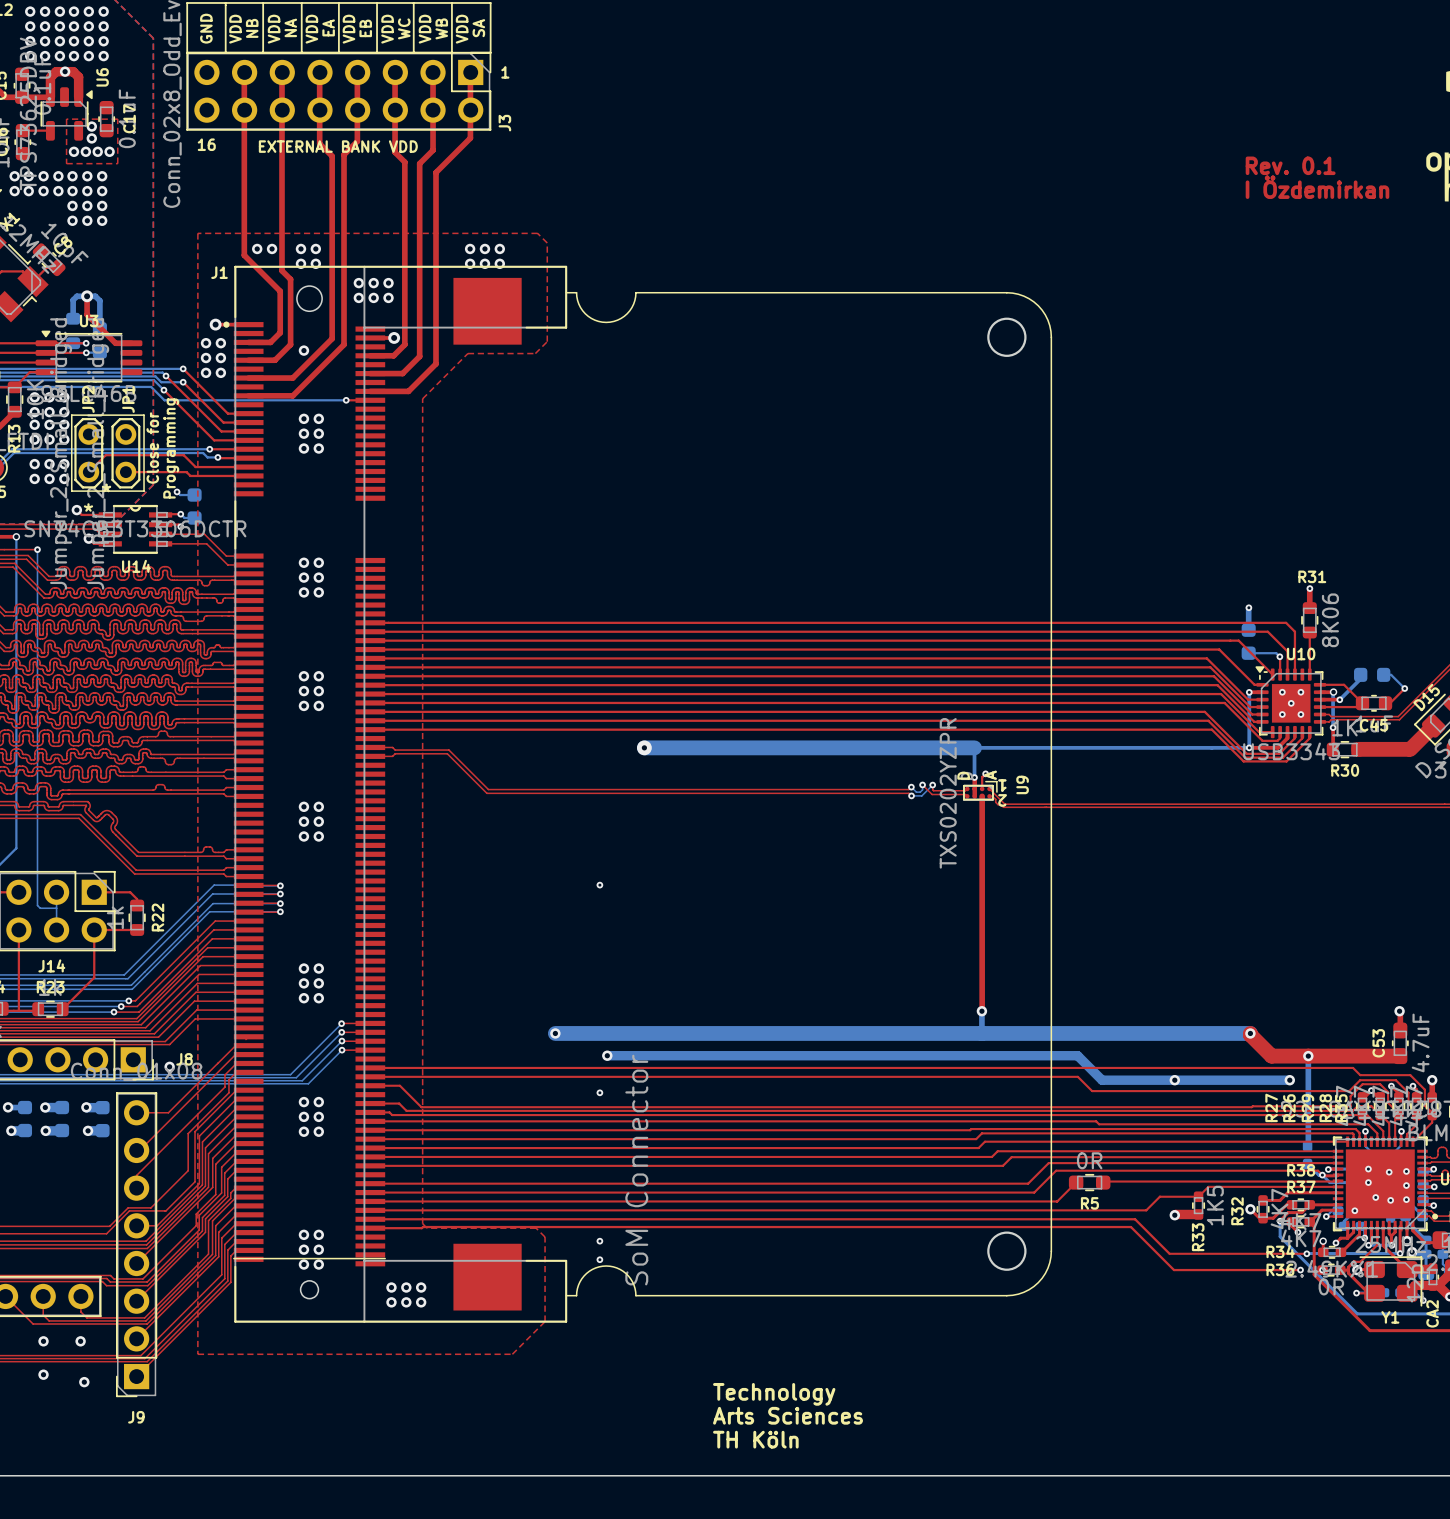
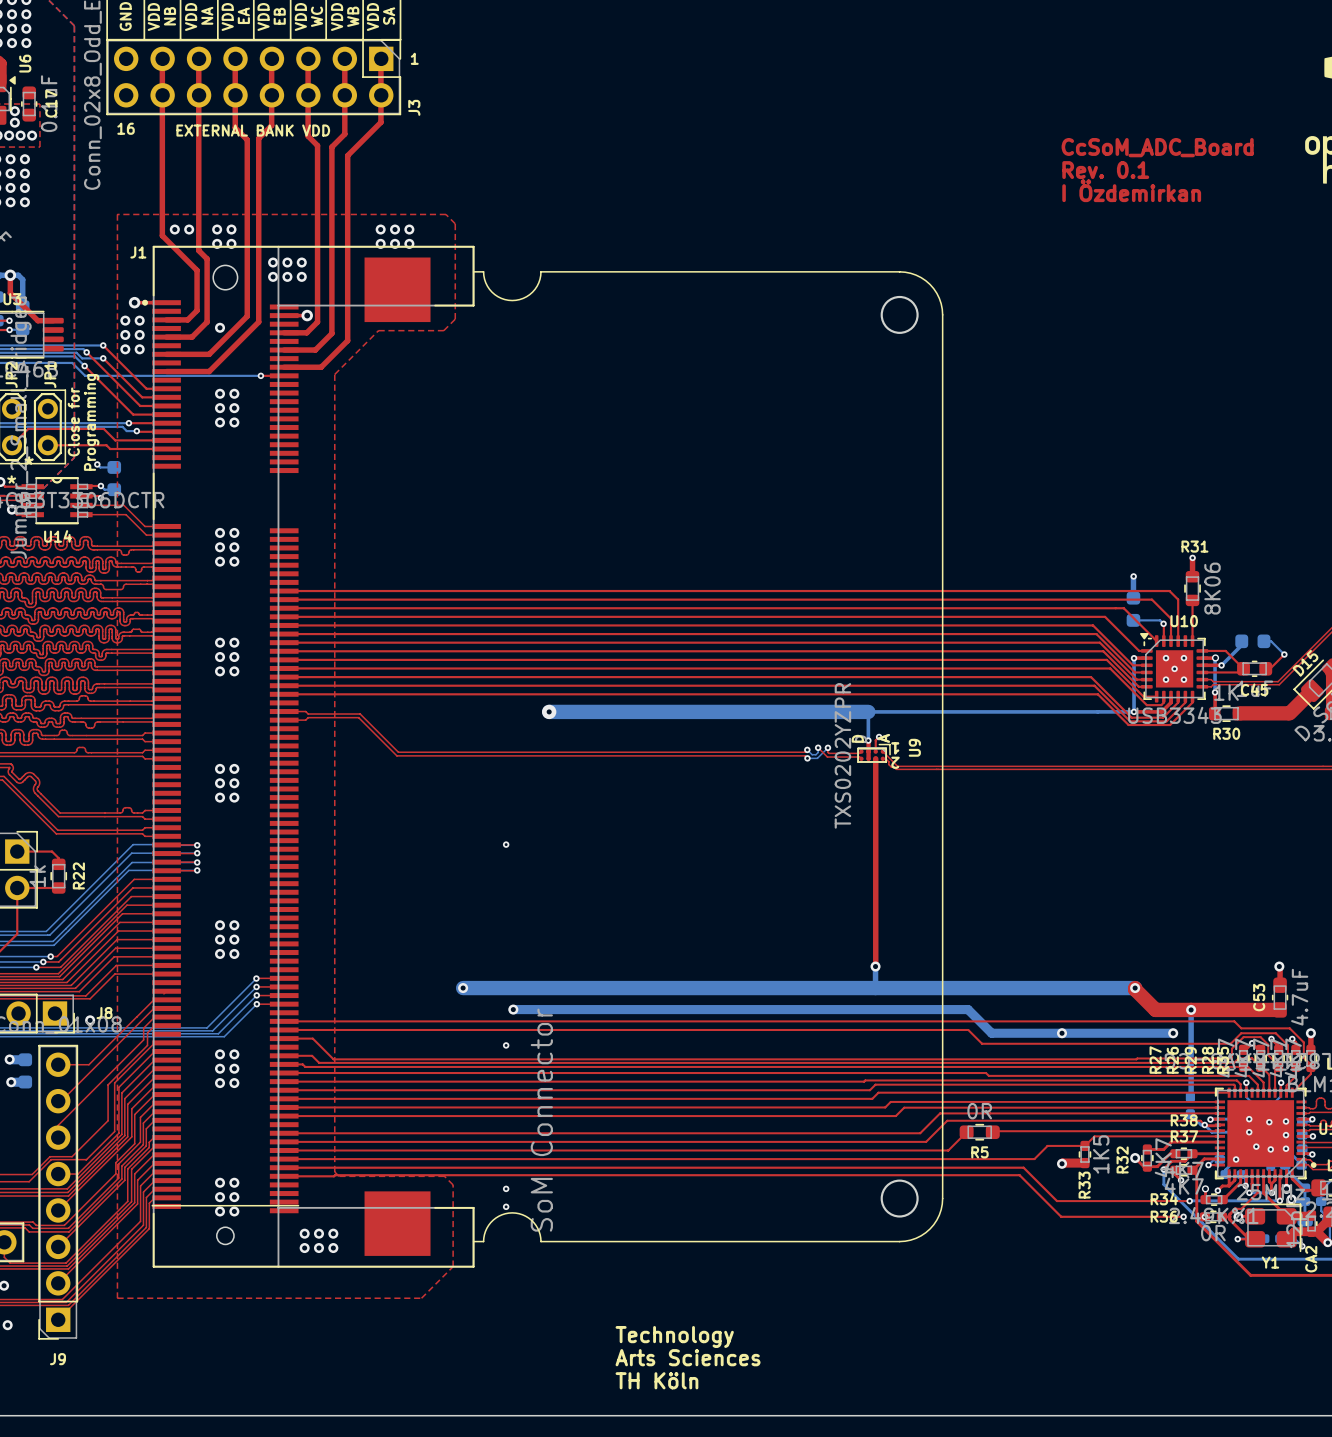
text: none -> CcSoM_ADC_Board (1157, 147)
text position: Rev. 0.1 (1290, 165) -> Rev. 0.1 (1105, 170)
text position: I Özdemirkan (1317, 187) -> I Özdemirkan (1131, 190)

